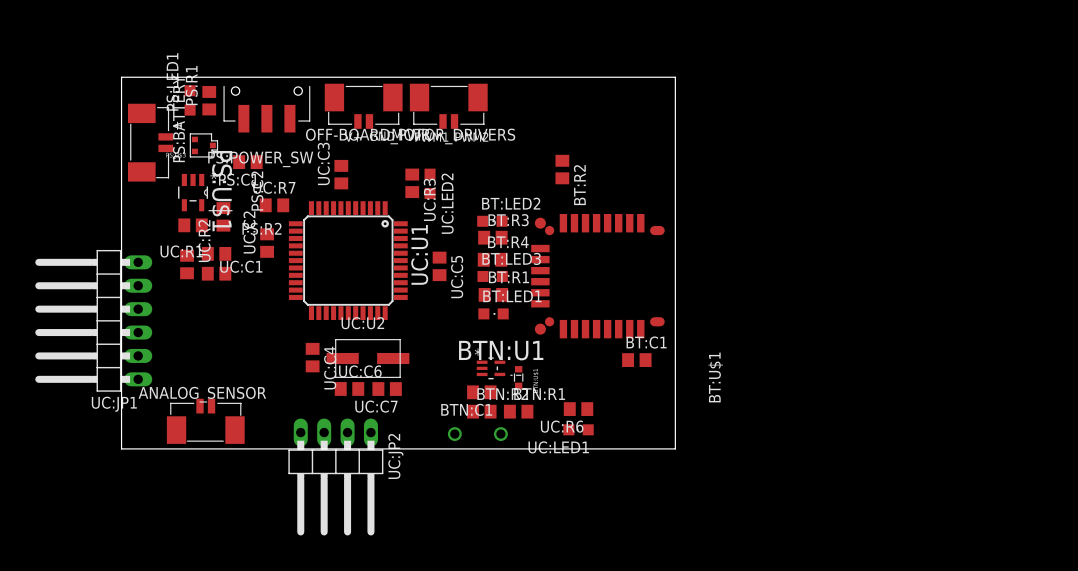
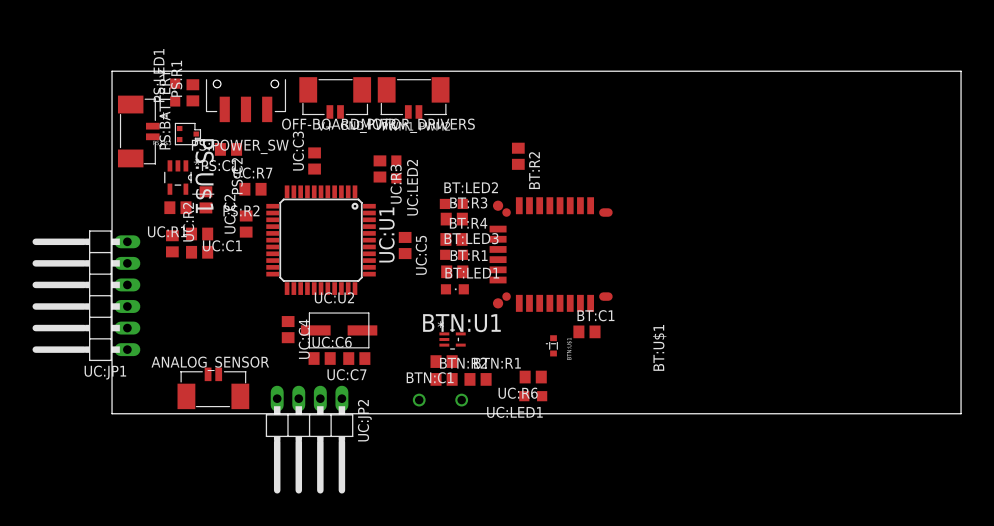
board edge: (675, 77) (675, 448) -> (622, 71) (961, 71) (961, 413) (622, 413)
part position: (516, 377) -> (551, 345)
ANALOG_SENSOR position: (205, 421) -> (213, 388)

